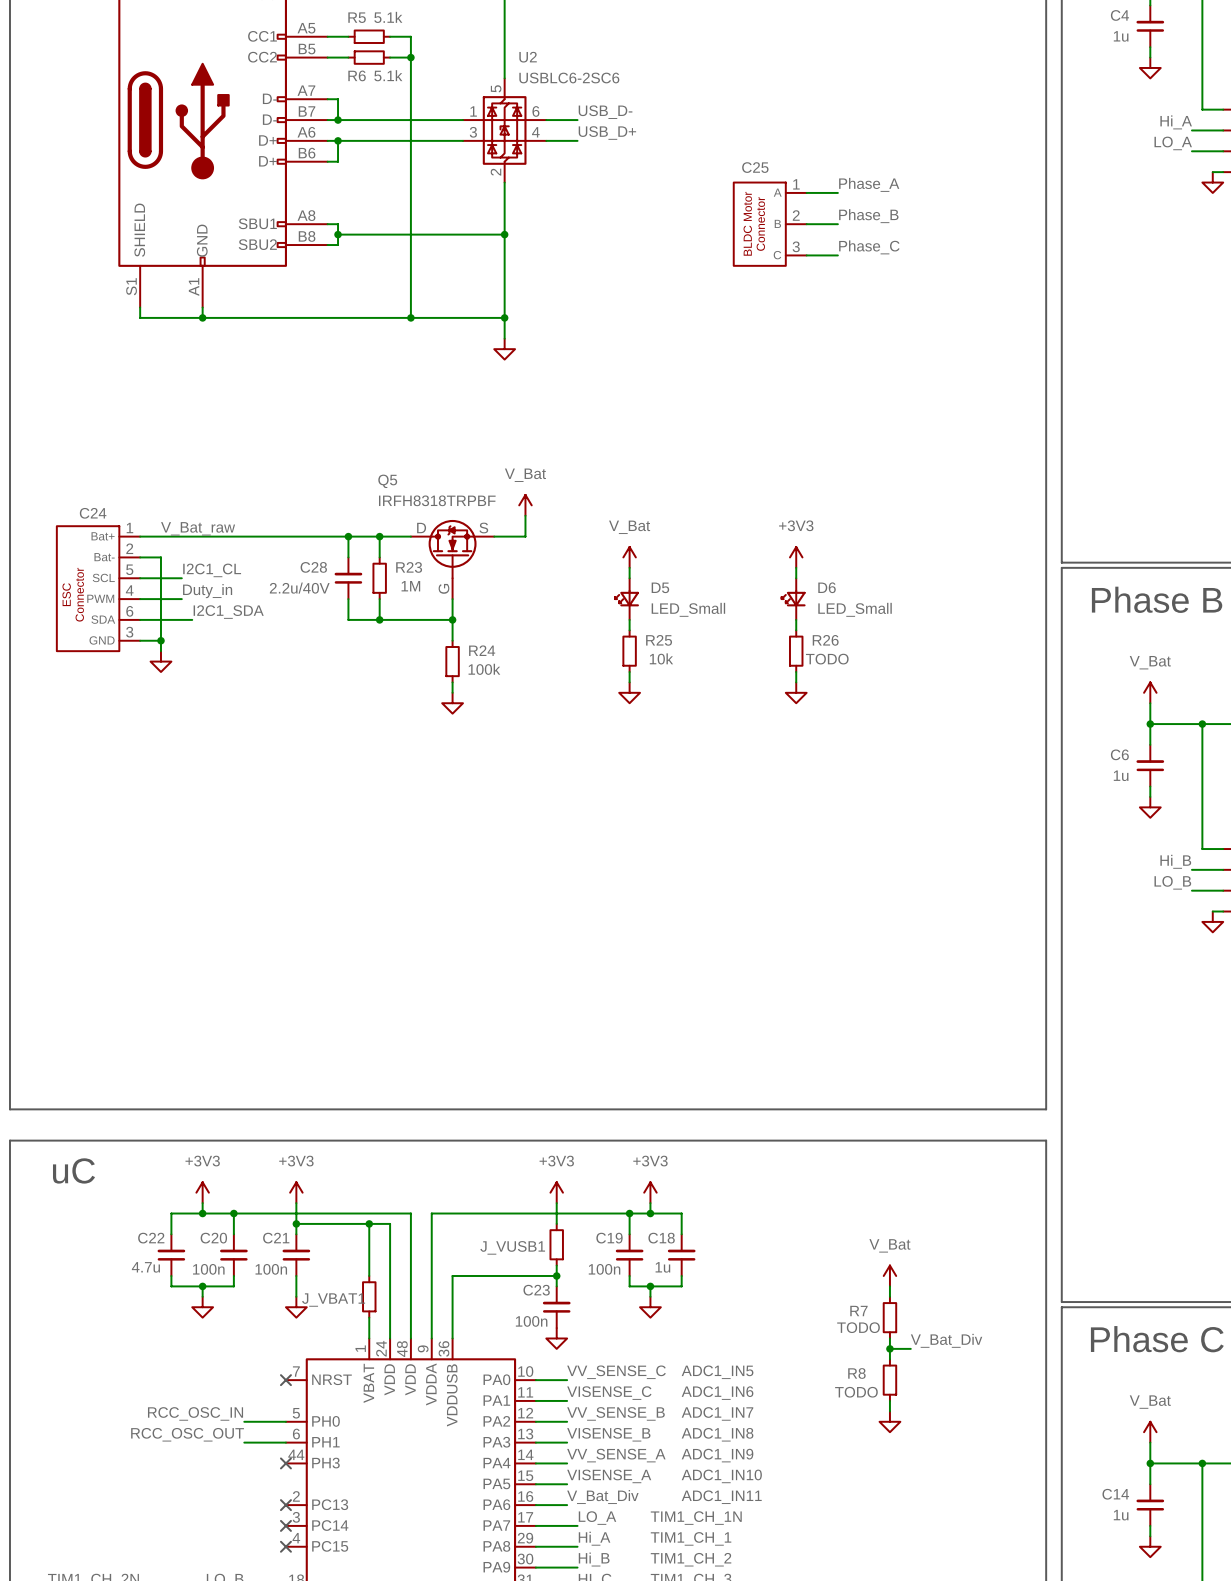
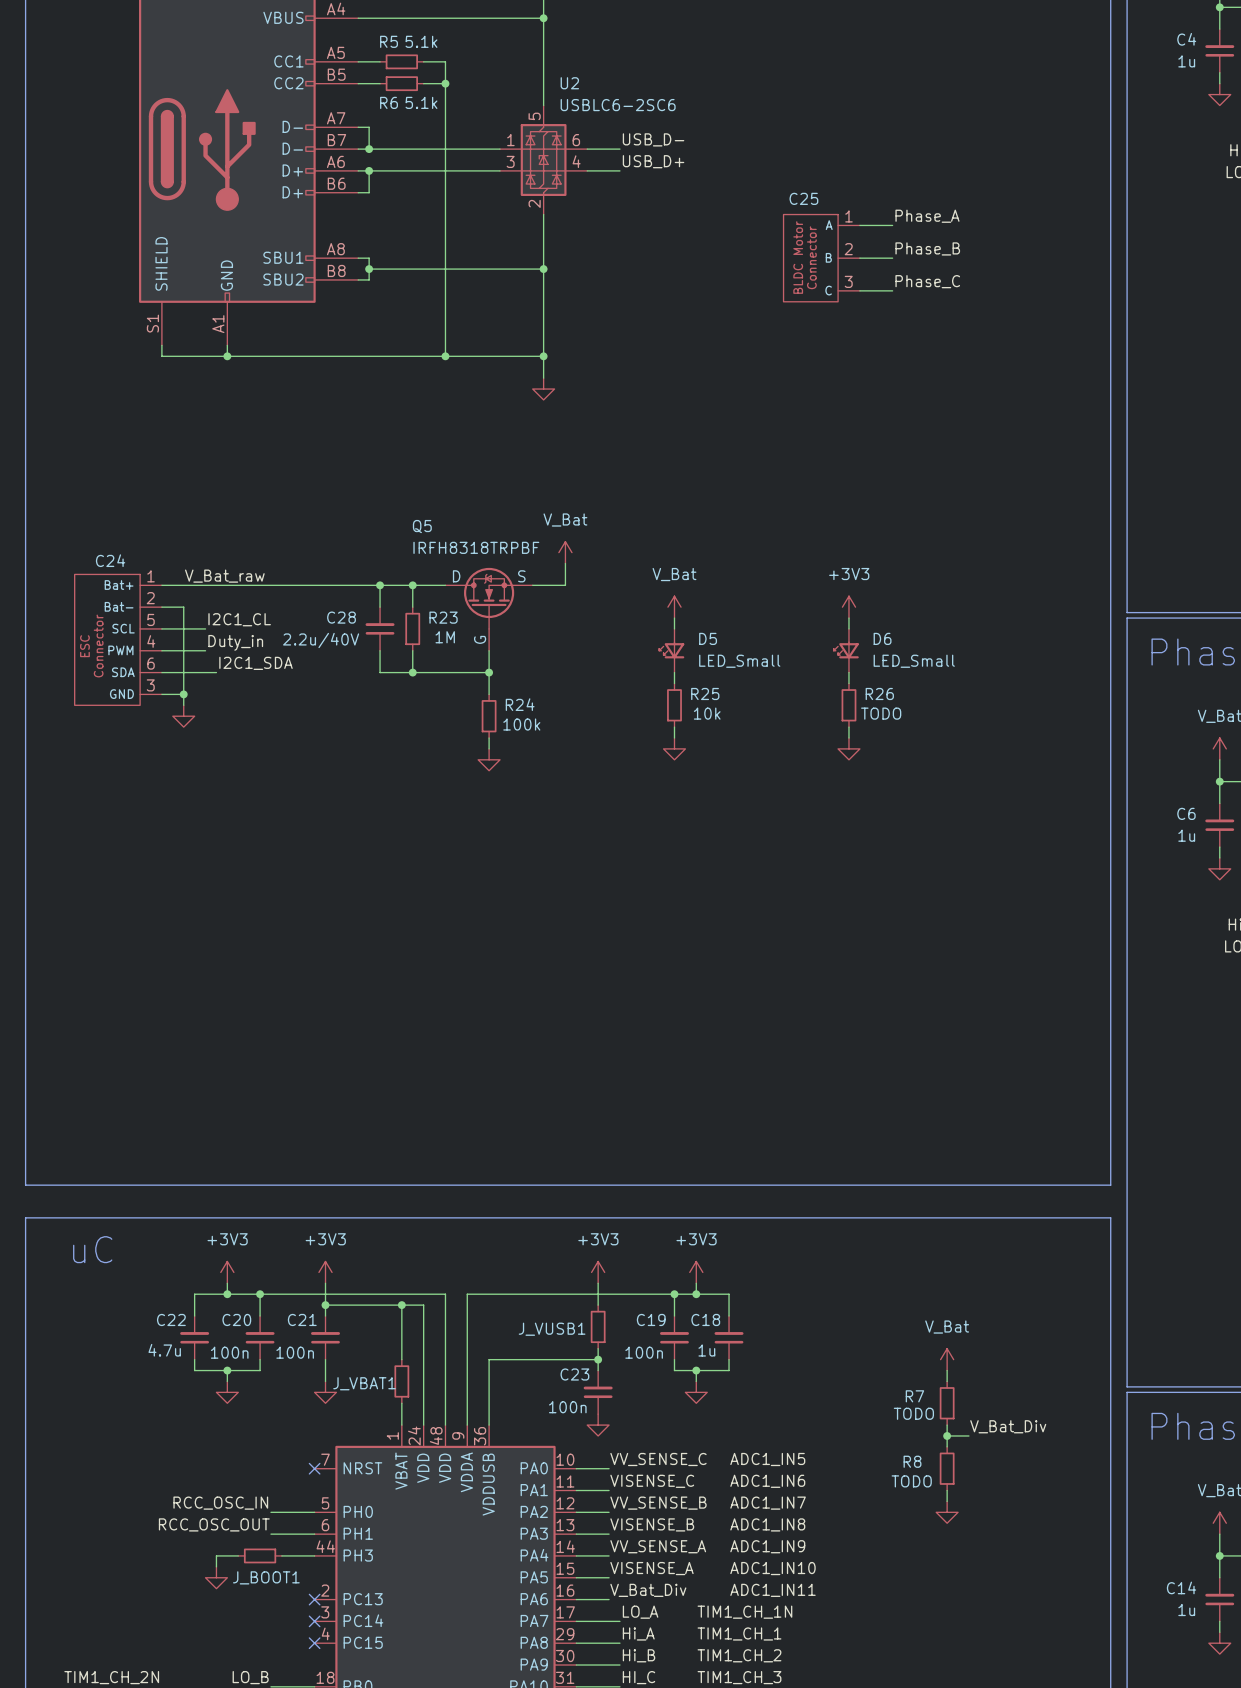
wire: none -> (238, 1555) (216, 1555) (216, 1566)
J_BOOT1: none -> (260, 1555)
wire: none -> (281, 1555) (314, 1555)
no-connect mark: (285, 1463) -> none
power symbol: none -> (216, 1577)

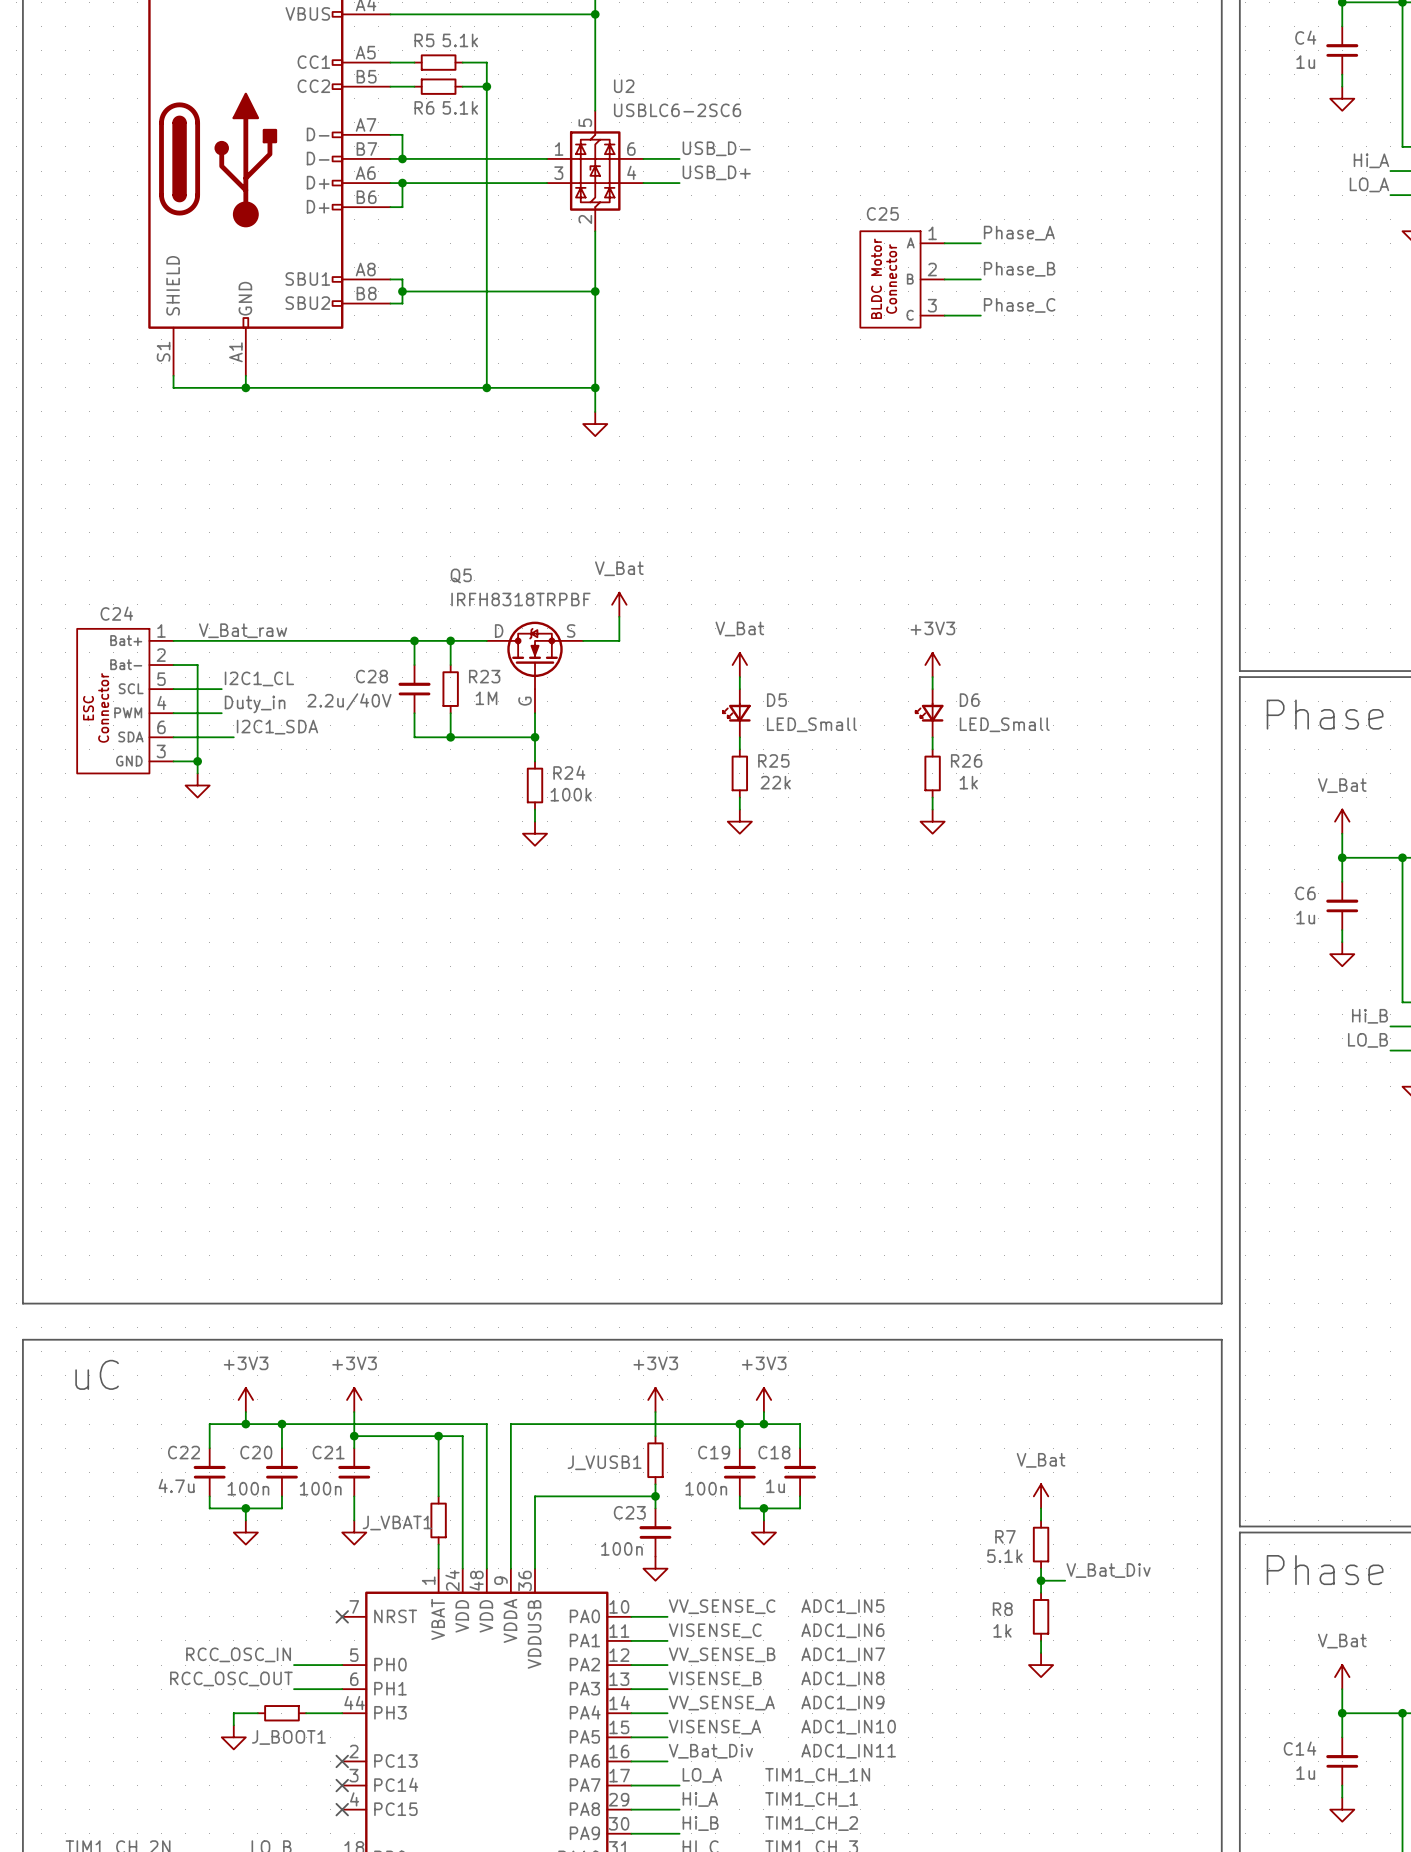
R25 value: 10k (707, 713) -> 22k (775, 782)
R26 value: TODO (881, 713) -> 1k (968, 782)
R7 value: TODO (913, 1413) -> 5.1k (1004, 1556)
R8 value: TODO (911, 1481) -> 1k (1002, 1630)

